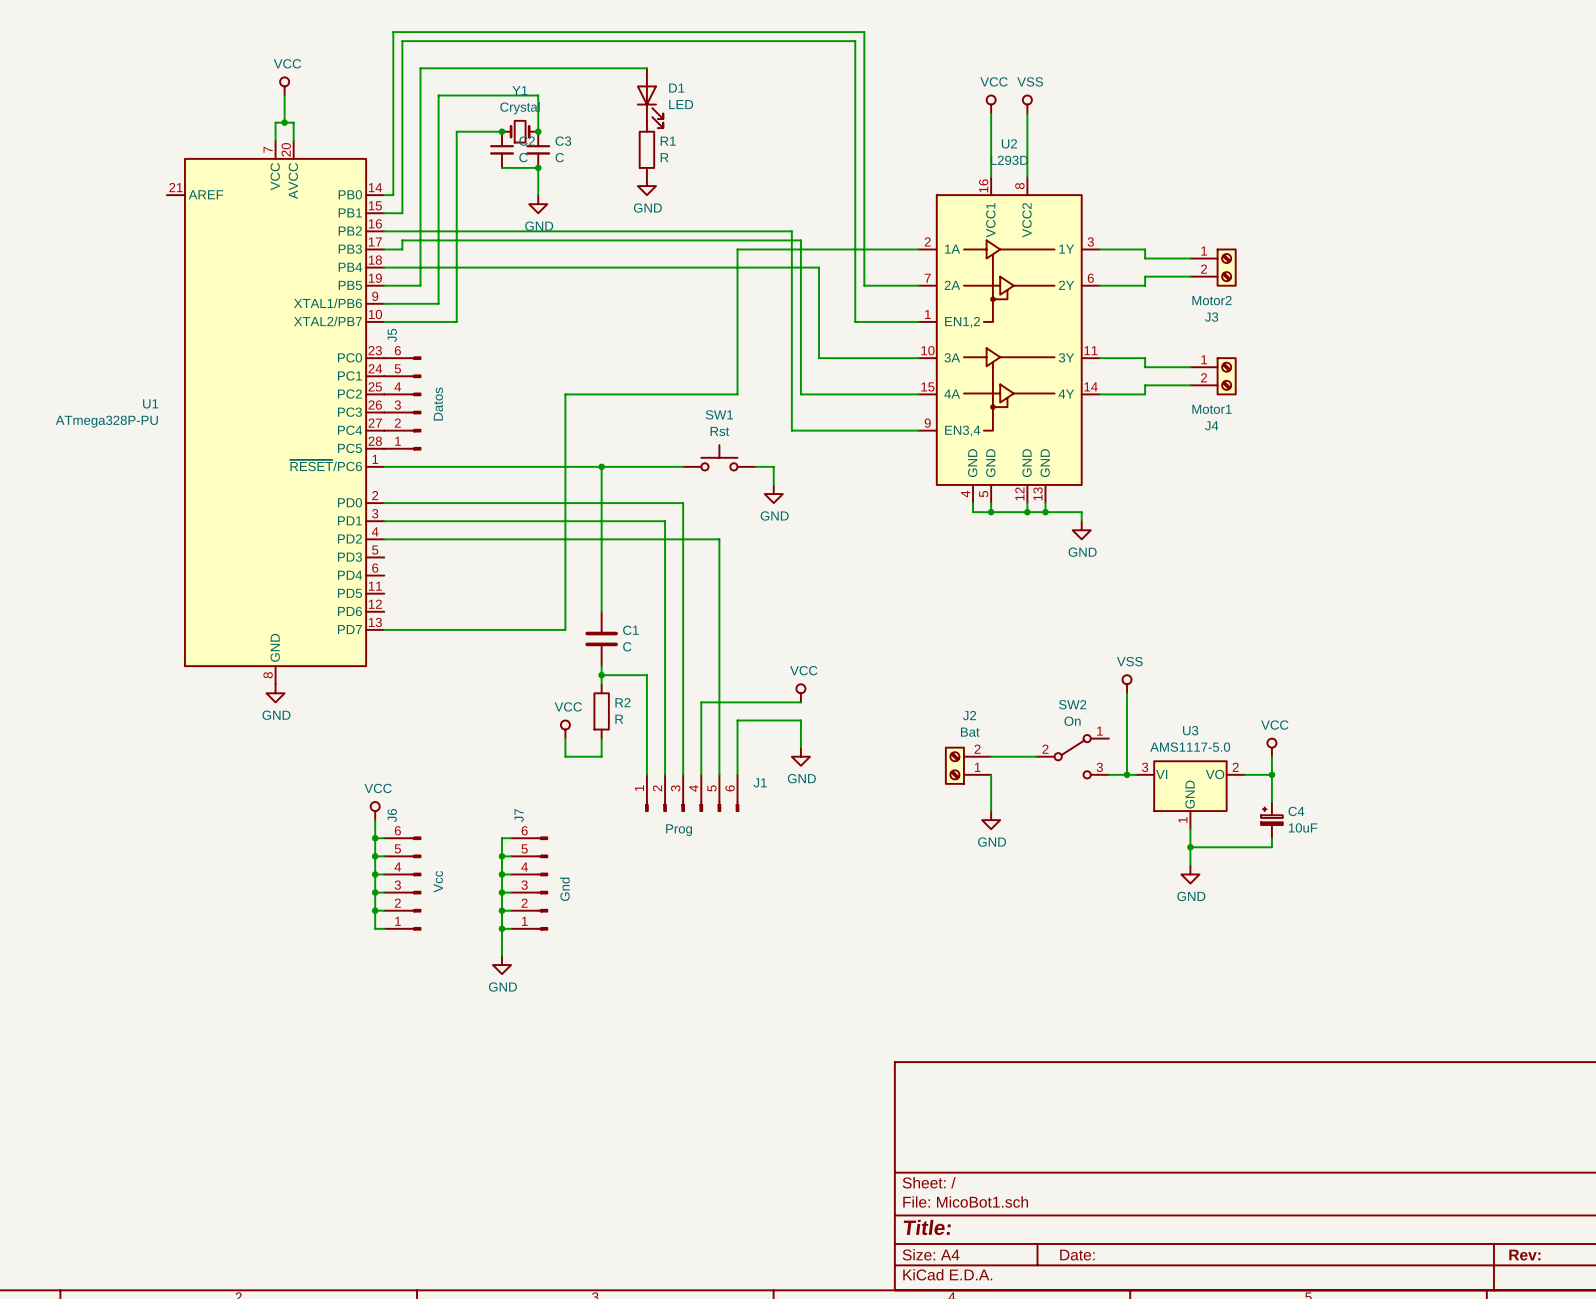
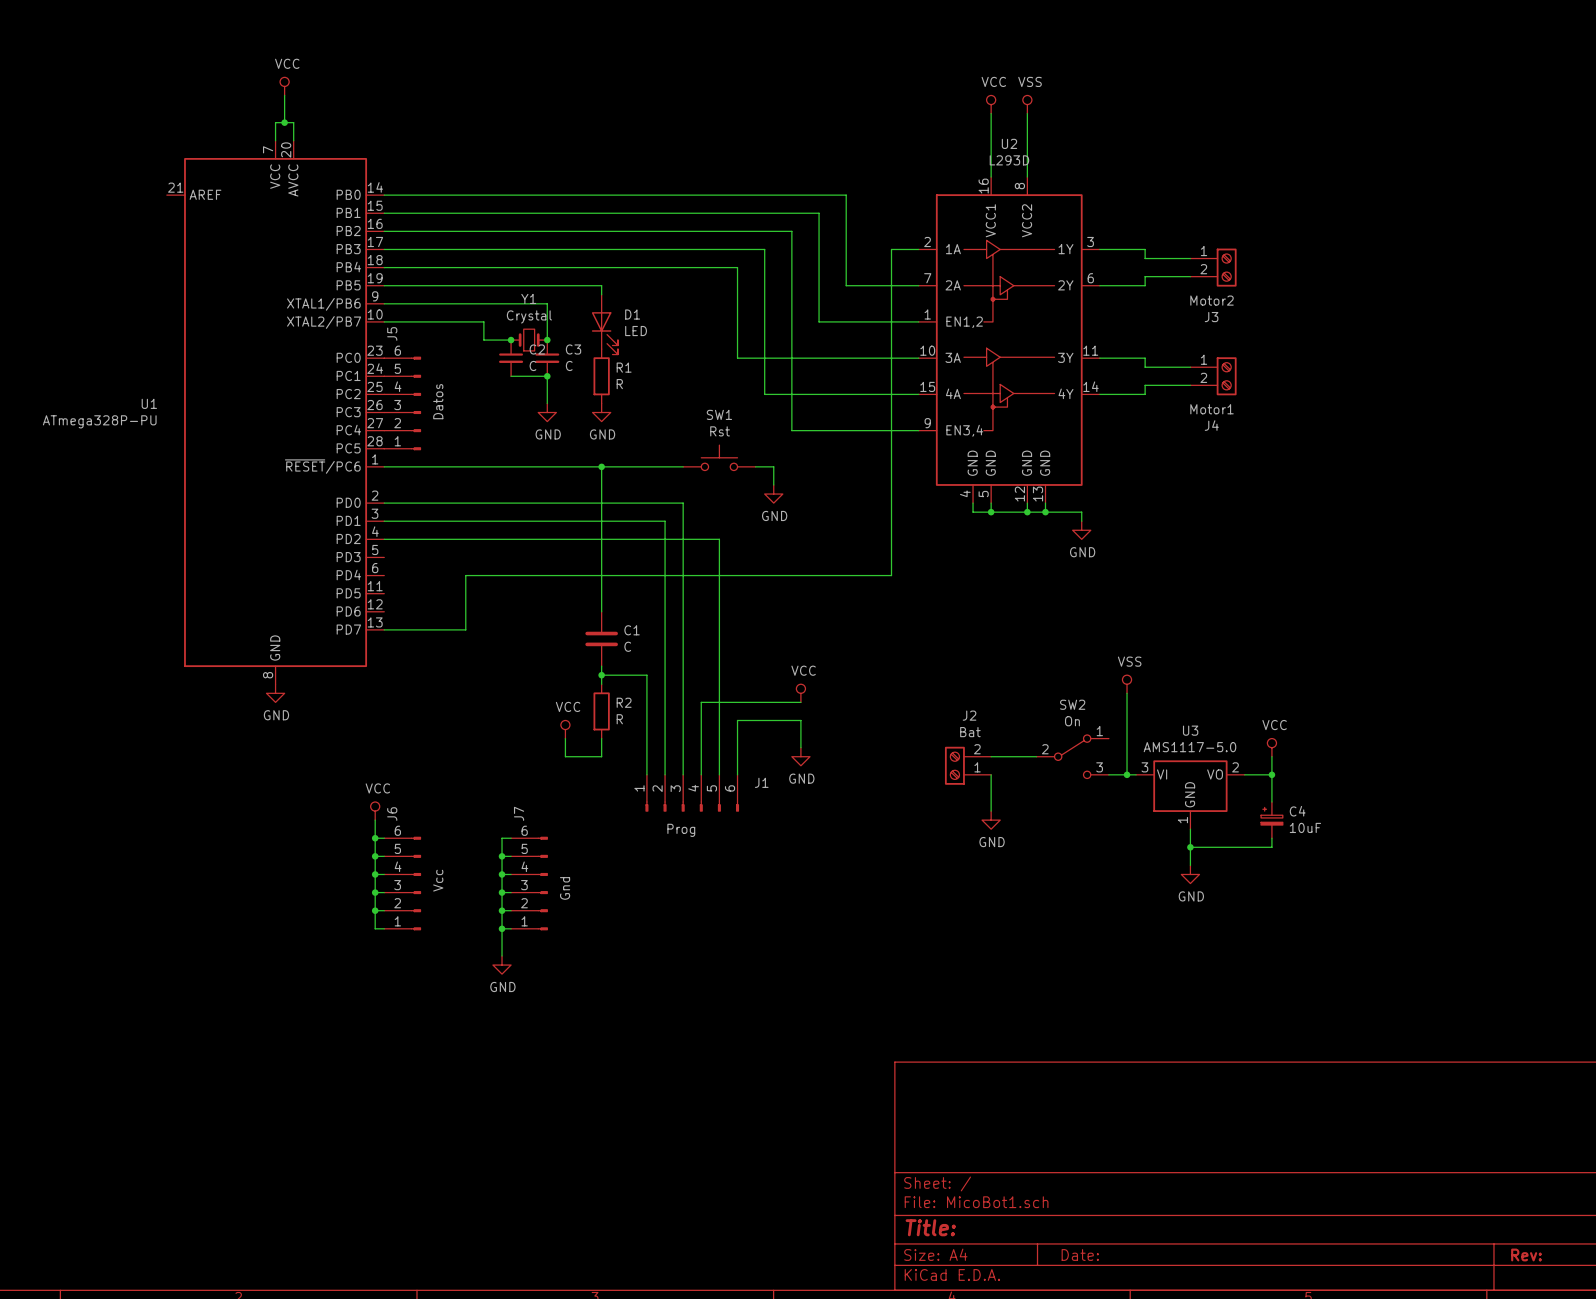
wire: (646, 68) (420, 68) (420, 285) -> (601, 294) (601, 285) (420, 285)
D1 position: (650, 98) -> (604, 324)
wire: (502, 131) (456, 131) (456, 321) -> (511, 340) (483, 340) (483, 321) (456, 321)
junction: (502, 131) -> none
Y1 position: (520, 131) -> (529, 340)
wire: (538, 131) (538, 95) (438, 95) (438, 303) -> (547, 340) (547, 303) (438, 303)
junction: (538, 131) -> none
C2 position: (502, 149) -> (511, 358)
C3 position: (538, 149) -> (547, 358)
R1 position: (646, 149) -> (601, 376)
wire: (502, 167) (538, 167) (538, 195) -> none
junction: (538, 167) -> none
power symbol: GND (646, 186) -> none
wire: (393, 195) (393, 32) (864, 32) (864, 285) -> (393, 195) (846, 195) (846, 285) (864, 285)
power symbol: GND (538, 204) -> none
wire: (402, 213) (402, 41) (855, 41) (855, 321) -> (402, 213) (819, 213) (819, 267)
wire: (402, 249) (402, 240) (800, 240) (800, 394) -> (402, 249) (737, 249)
wire: (737, 249) (737, 267) (819, 267) -> none
wire: (764, 249) (891, 249) -> (764, 249) (764, 394) (800, 394)
wire: (819, 321) (819, 358) -> (819, 321) (855, 321)
junction: none -> (511, 340)
junction: none -> (547, 340)
wire: (737, 358) (737, 394) (565, 394) (565, 629) (465, 629) -> (891, 249) (891, 575) (465, 575) (465, 629)
wire: none -> (737, 358) (819, 358)
wire: none -> (511, 376) (547, 376) (547, 403)
junction: none -> (547, 376)
power symbol: none -> GND (547, 412)
power symbol: none -> GND (601, 412)

